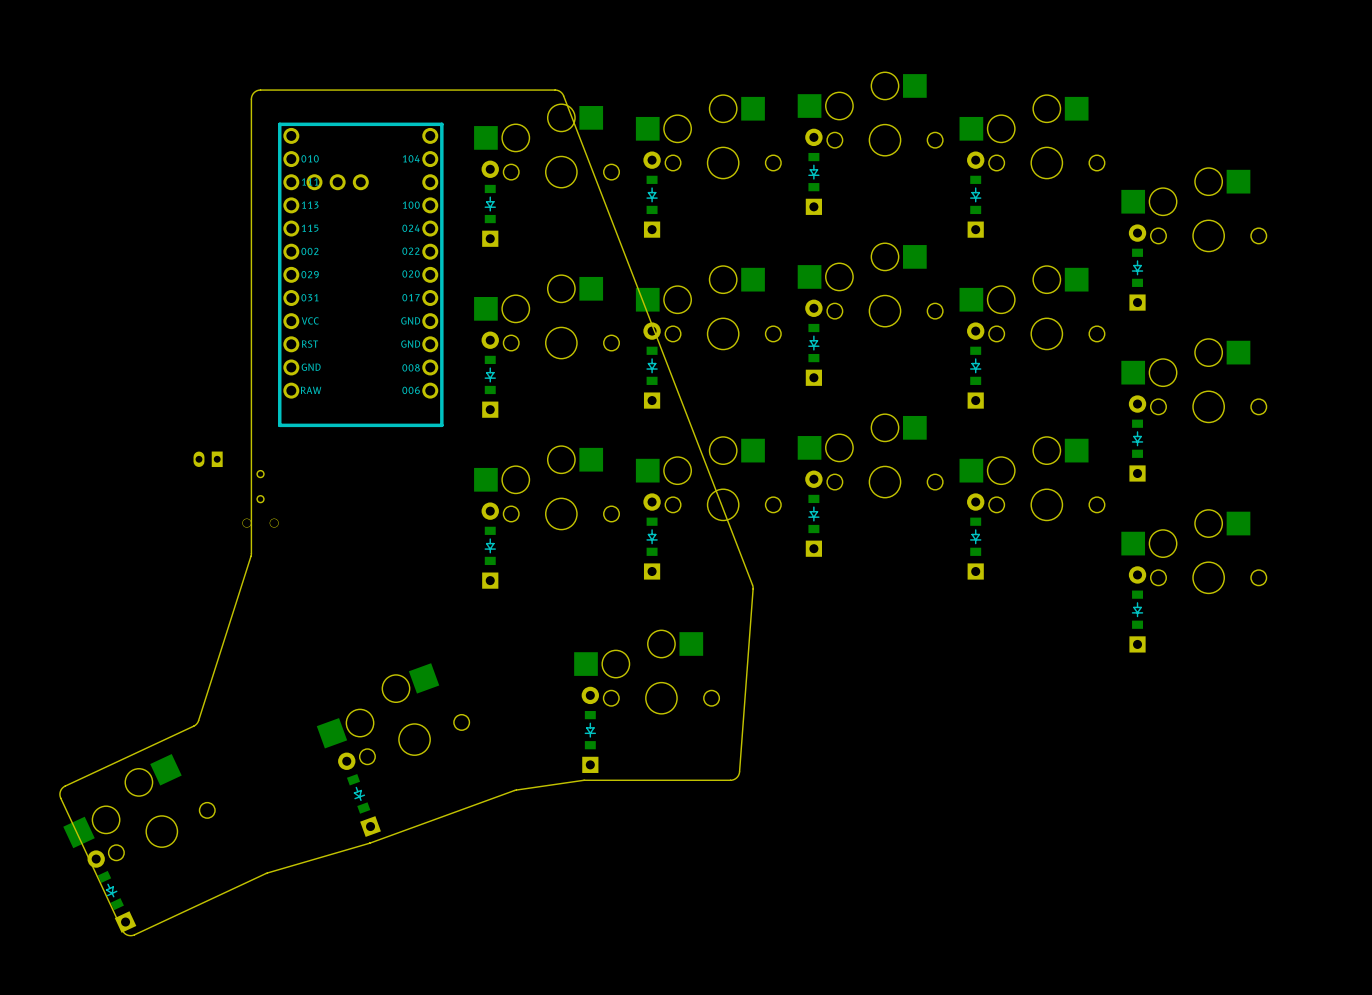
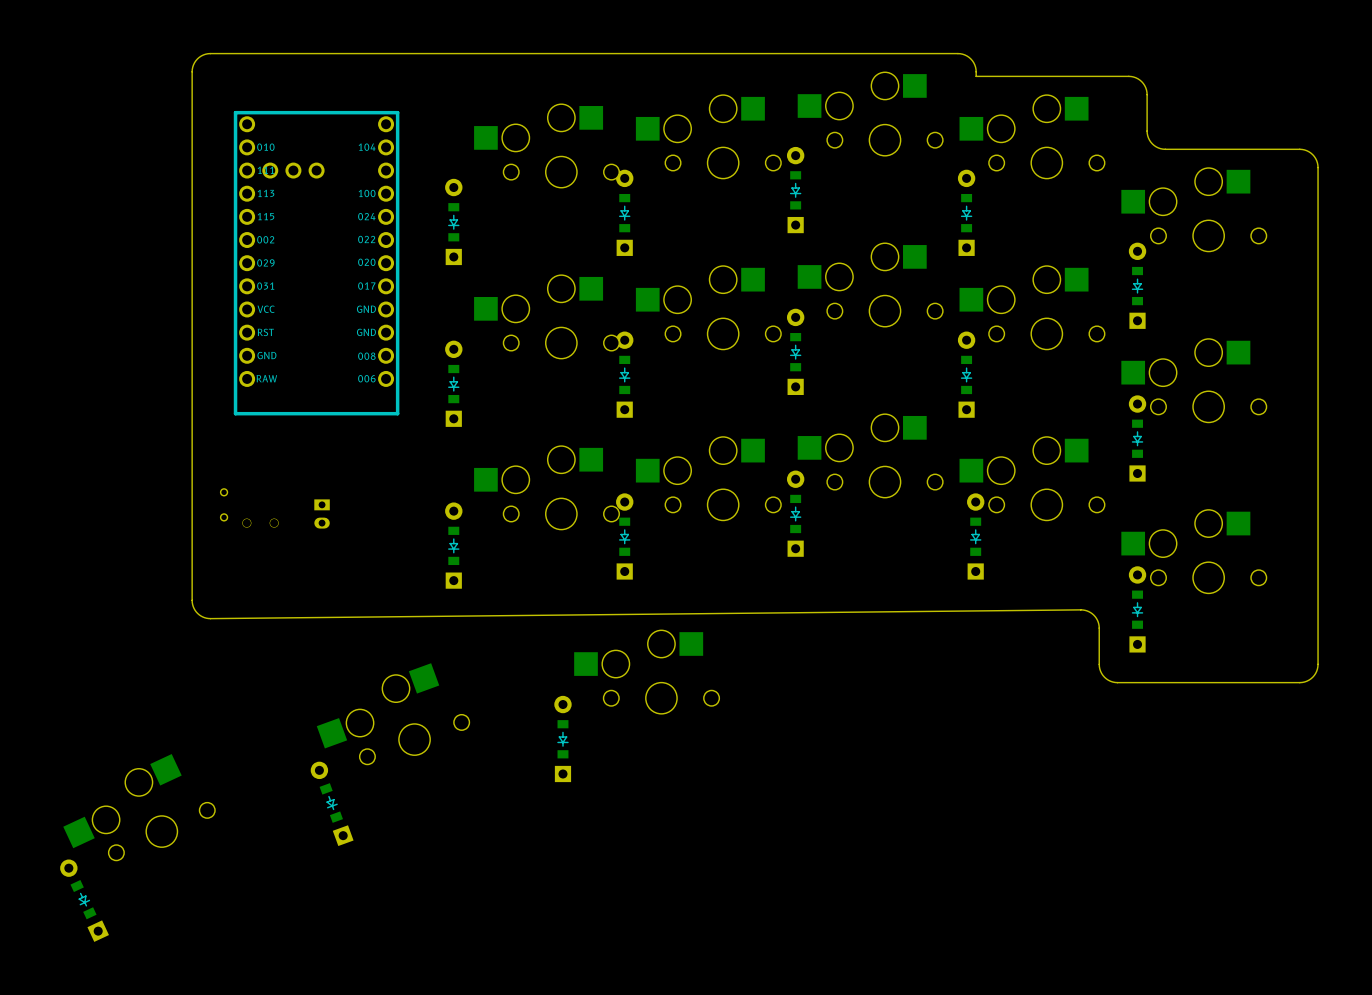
board edge: none -> (957, 53) (210, 53) (199, 57) (193, 64) (192, 71) (192, 600) (196, 611) (202, 616) (210, 618) (1082, 609) (1092, 613) (1098, 622) (1099, 669) (1104, 677) (1112, 682) (1299, 682) (1310, 678) (1315, 673) (1318, 664) (1318, 167) (1315, 158) (1308, 151) (1299, 149) (1160, 148) (1154, 145) (1148, 138) (1146, 89) (1143, 83) (1135, 77) (976, 76) (975, 67) (972, 60) (967, 56) (957, 53)
board edge: (555, 90) (260, 90) (252, 94) (251, 555) (196, 723) (65, 786) (59, 793) (122, 930) (126, 934) (134, 934) (266, 873) (369, 843) (515, 790) (583, 780) (730, 780) (738, 775) (752, 585) (563, 95) (560, 91) (555, 90) -> none
part position: (813, 171) -> (795, 190)
part position: (652, 194) -> (624, 212)
part position: (975, 194) -> (966, 212)
part position: (490, 203) -> (453, 221)
part position: (1137, 267) -> (1137, 285)
part position: (360, 274) -> (316, 263)
part position: (813, 342) -> (795, 351)
part position: (652, 365) -> (624, 374)
part position: (975, 365) -> (966, 374)
part position: (490, 374) -> (453, 383)
part rotation: 0° (208, 459) -> 90° counterclockwise (322, 513)
part position: (208, 459) -> (322, 513)
part position: (260, 486) -> (224, 504)
part position: (813, 513) -> (795, 513)
part position: (652, 536) -> (624, 536)
part position: (490, 545) -> (453, 545)
part position: (590, 729) -> (562, 738)
part position: (359, 794) -> (332, 803)
part position: (111, 891) -> (84, 900)

